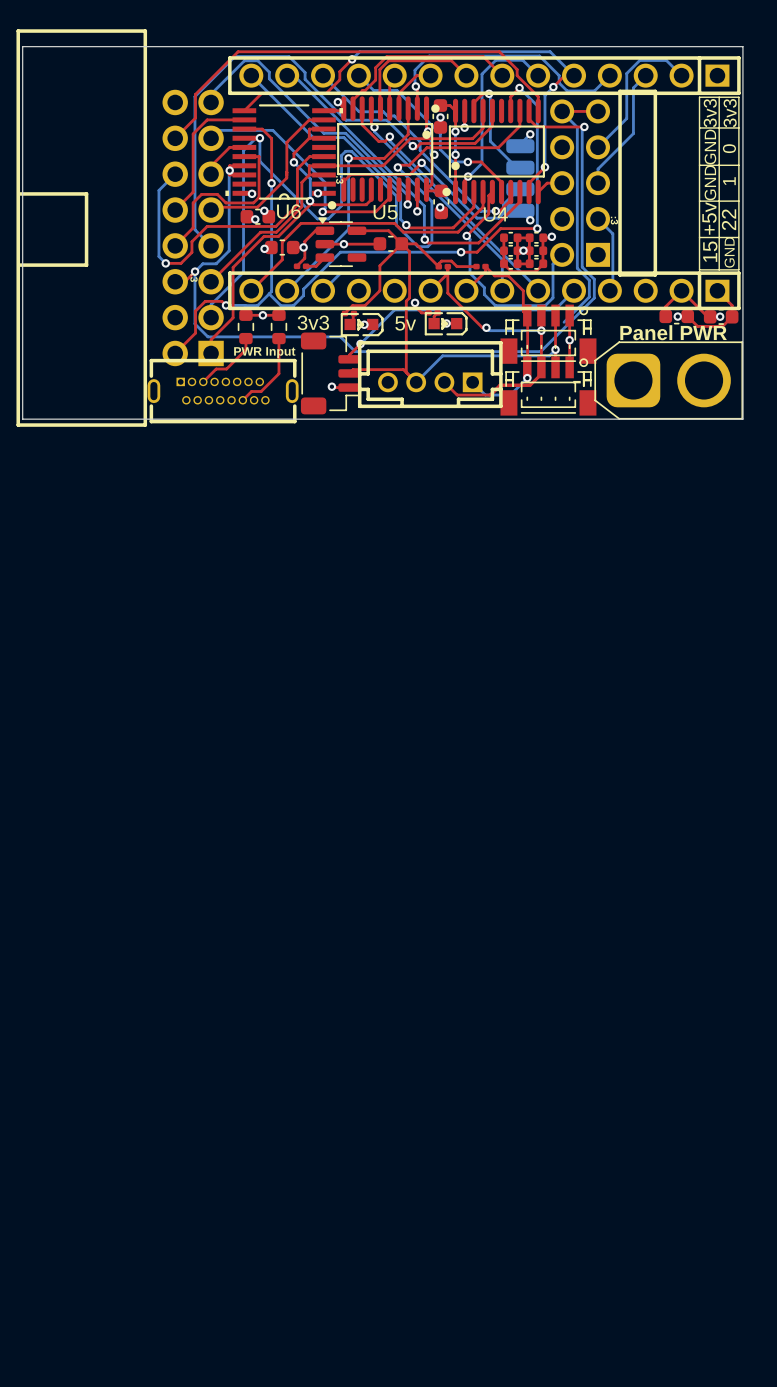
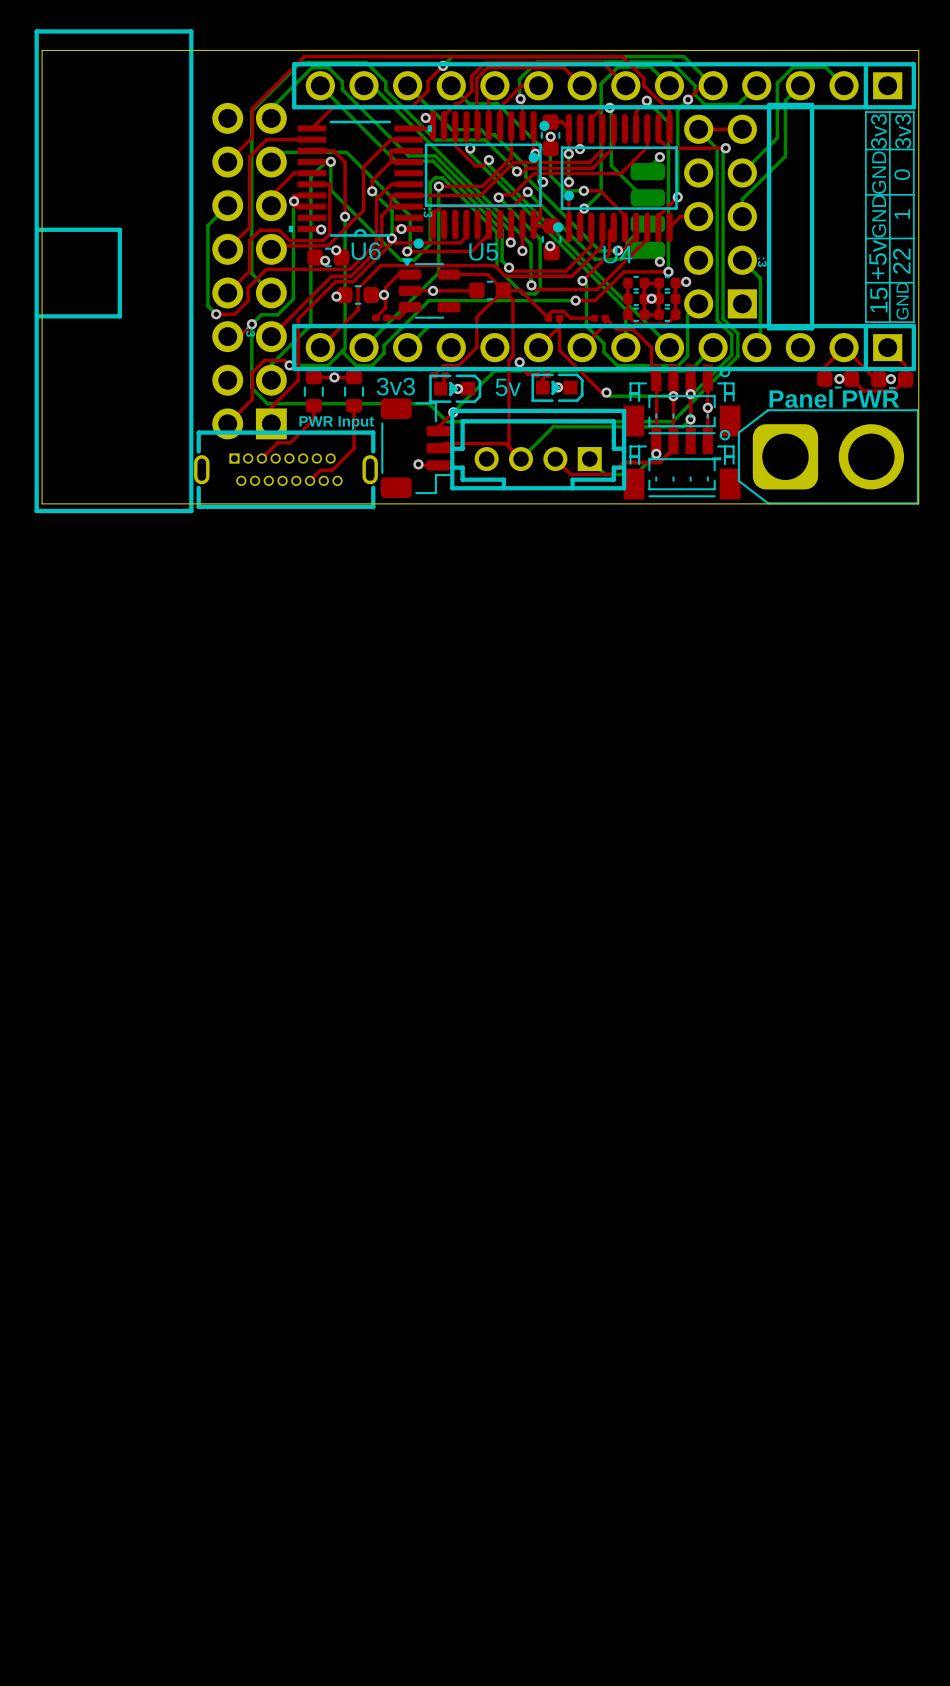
bottom track: none -> (701, 385) (690, 394)
via: none -> (690, 394)

